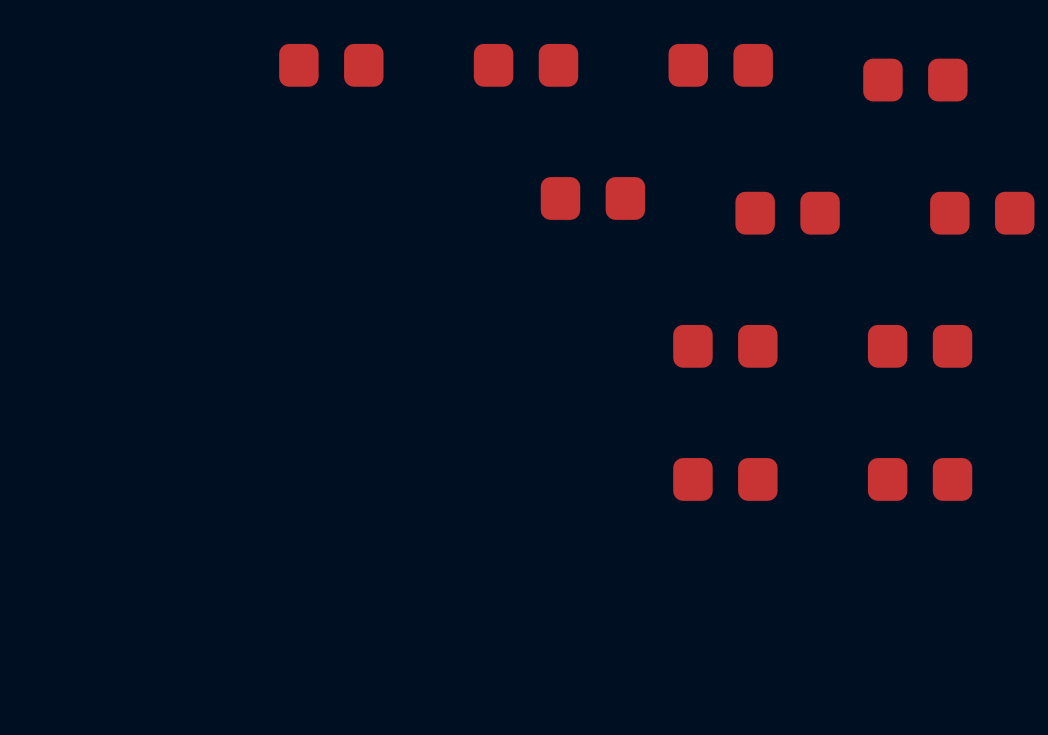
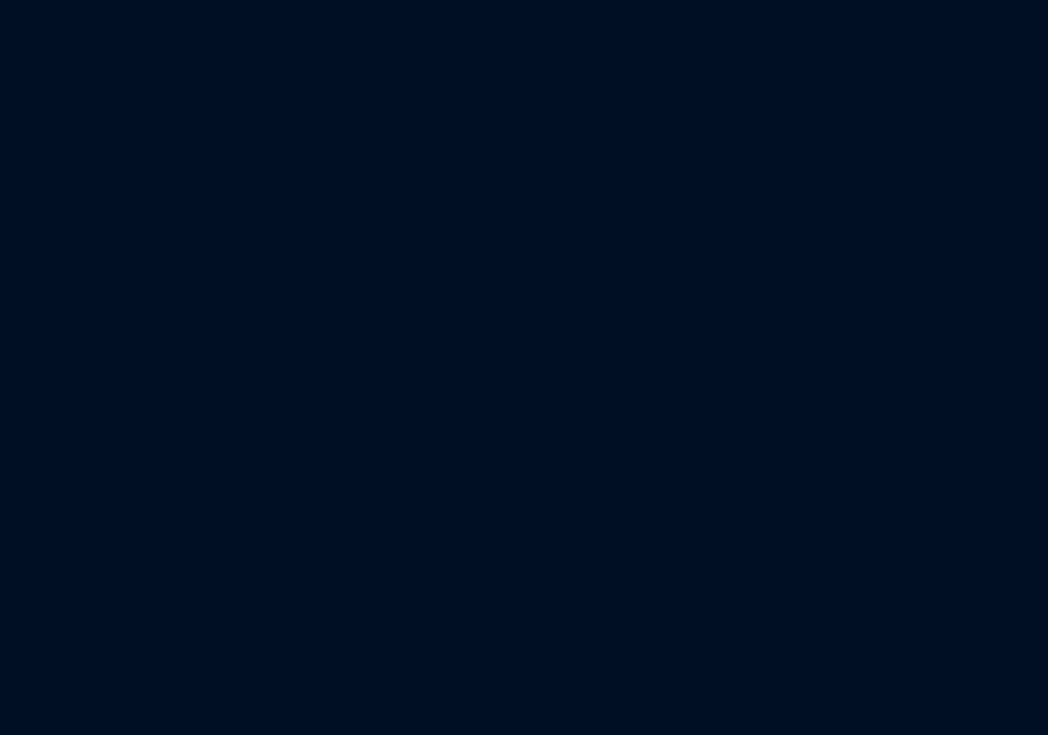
part: (331, 65) -> none
part: (526, 65) -> none
part: (720, 65) -> none
part: (915, 80) -> none
part: (592, 198) -> none
part: (787, 213) -> none
part: (982, 213) -> none
part: (725, 346) -> none
part: (920, 346) -> none
part: (725, 479) -> none
part: (920, 479) -> none

